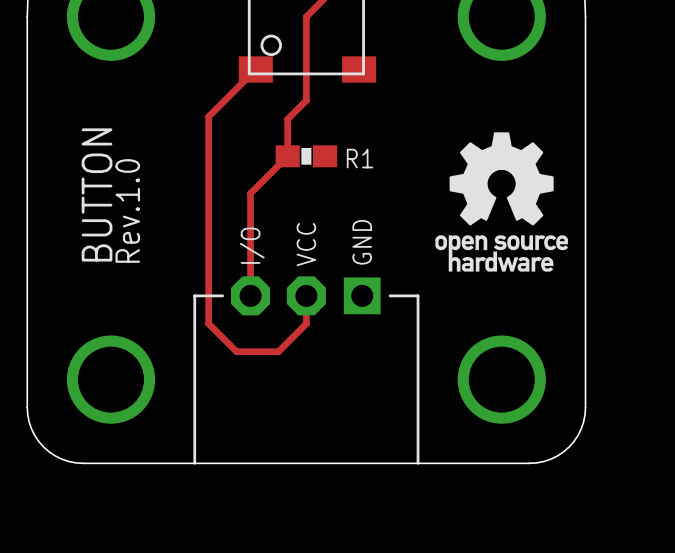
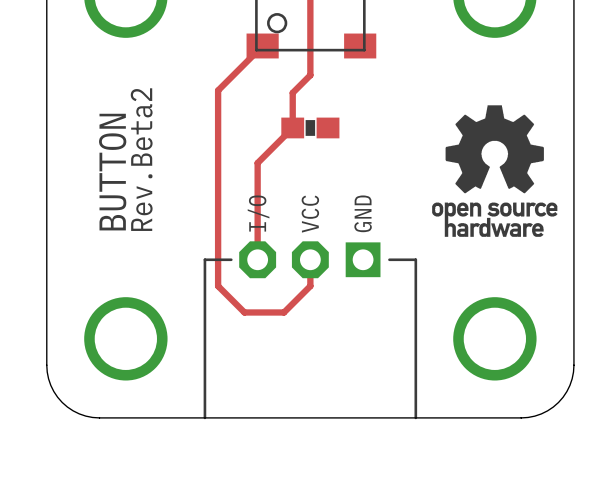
R1 name: R1 (359, 158) -> none
text: Rev.1.0 (127, 210) -> Rev.Beta2 (141, 159)

